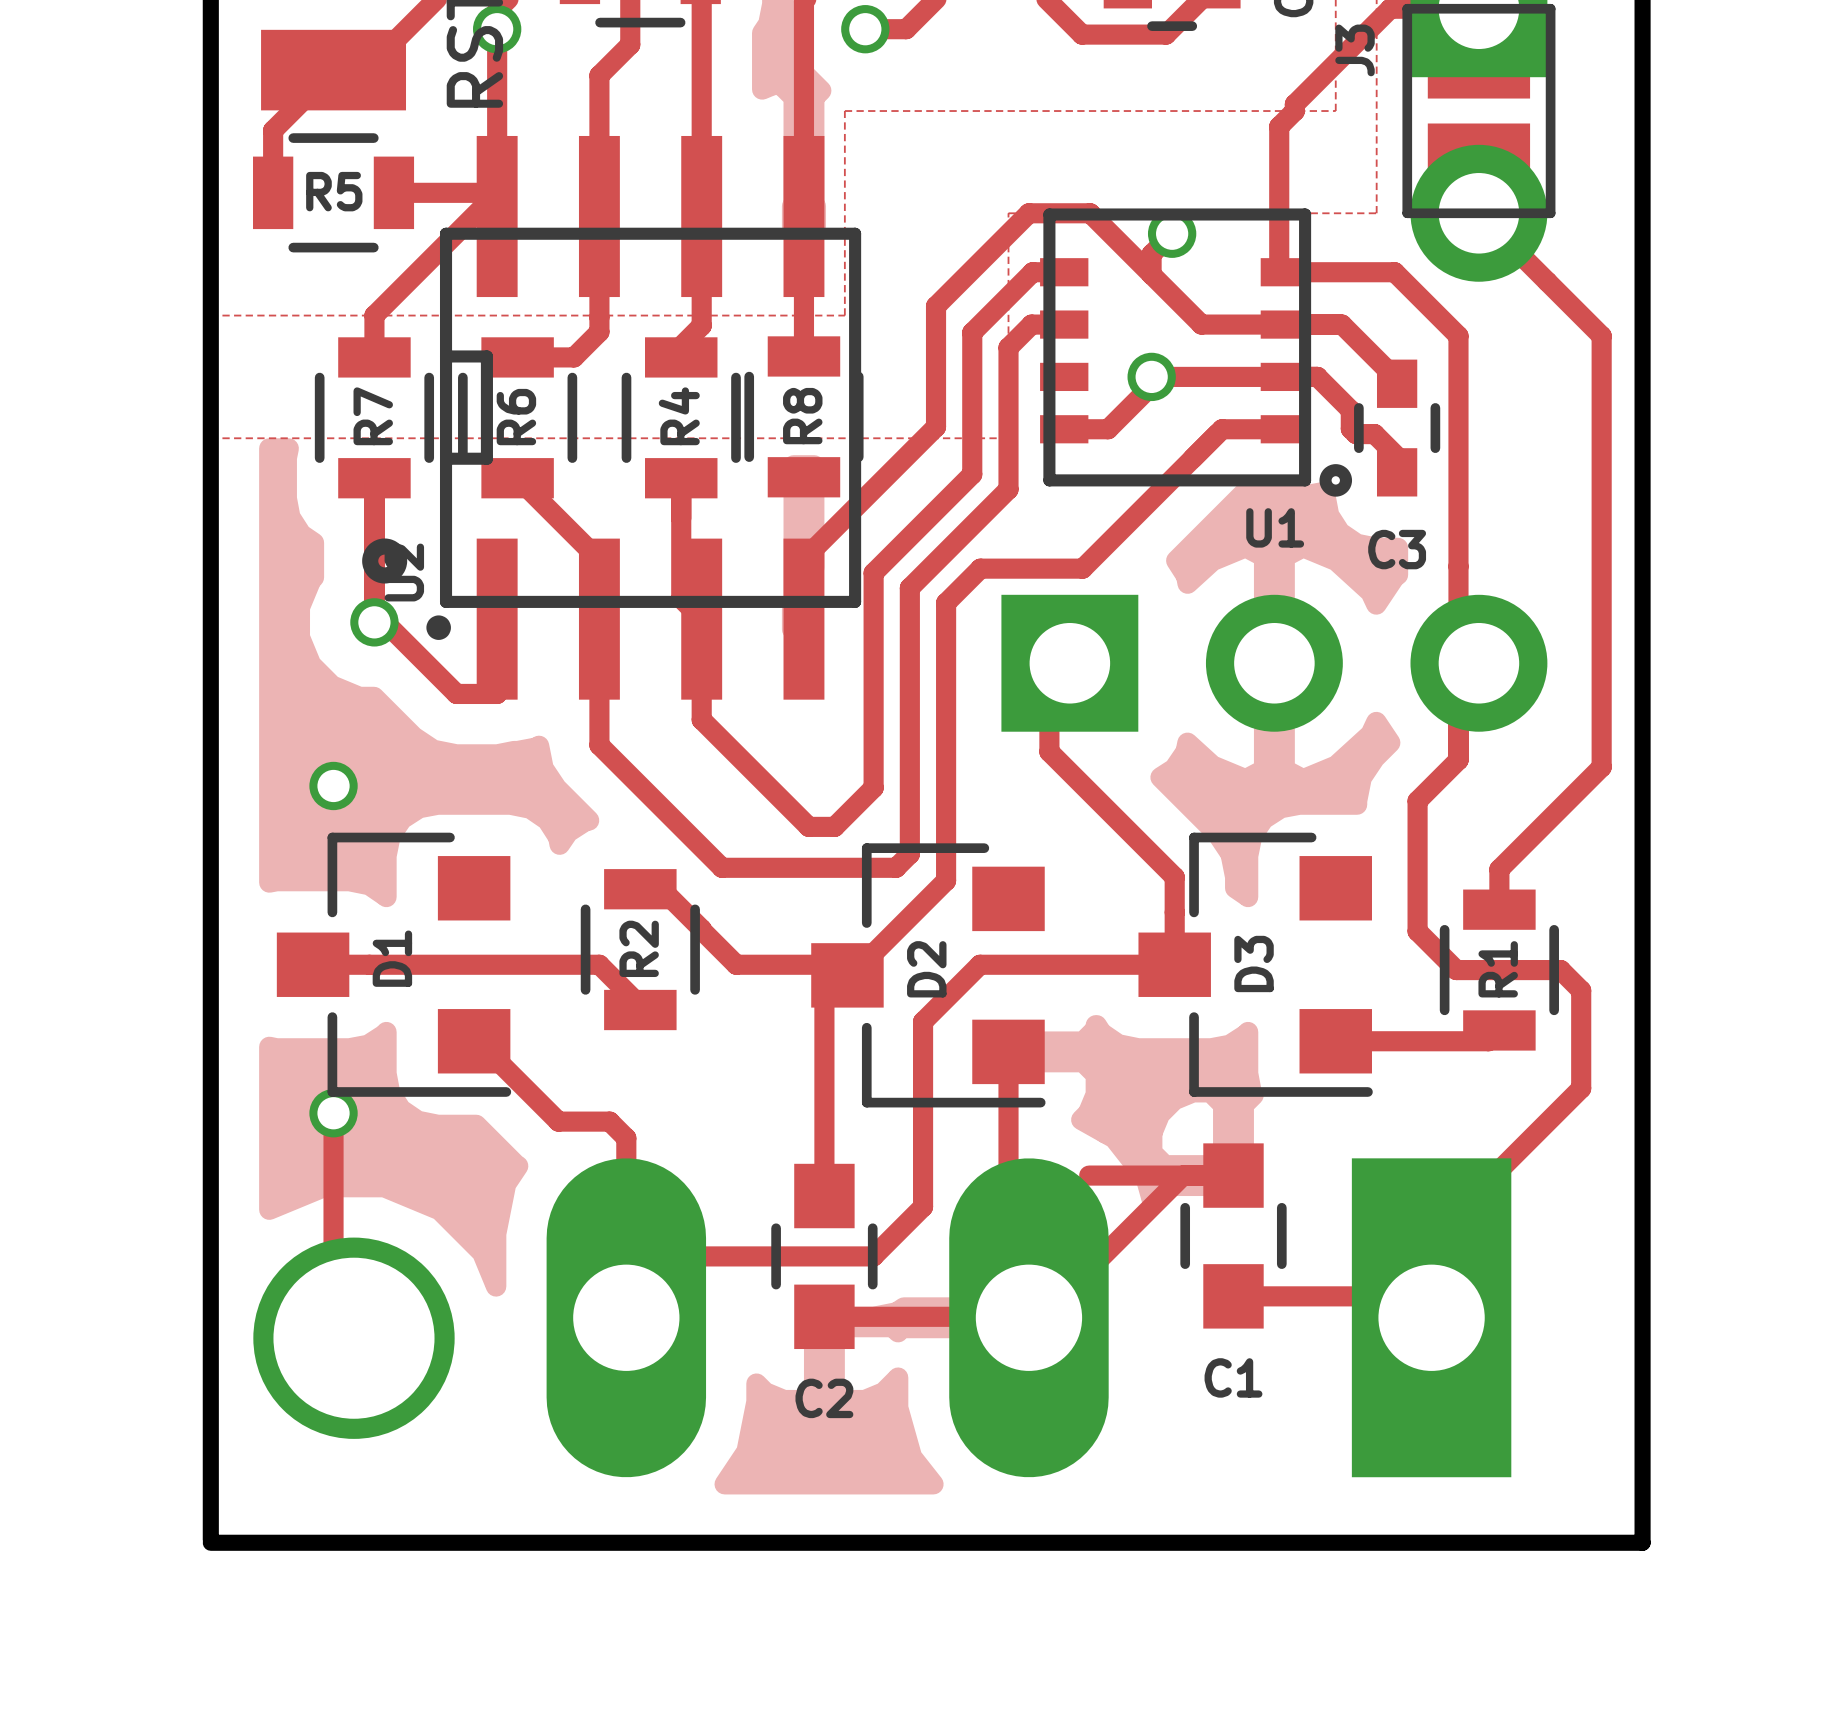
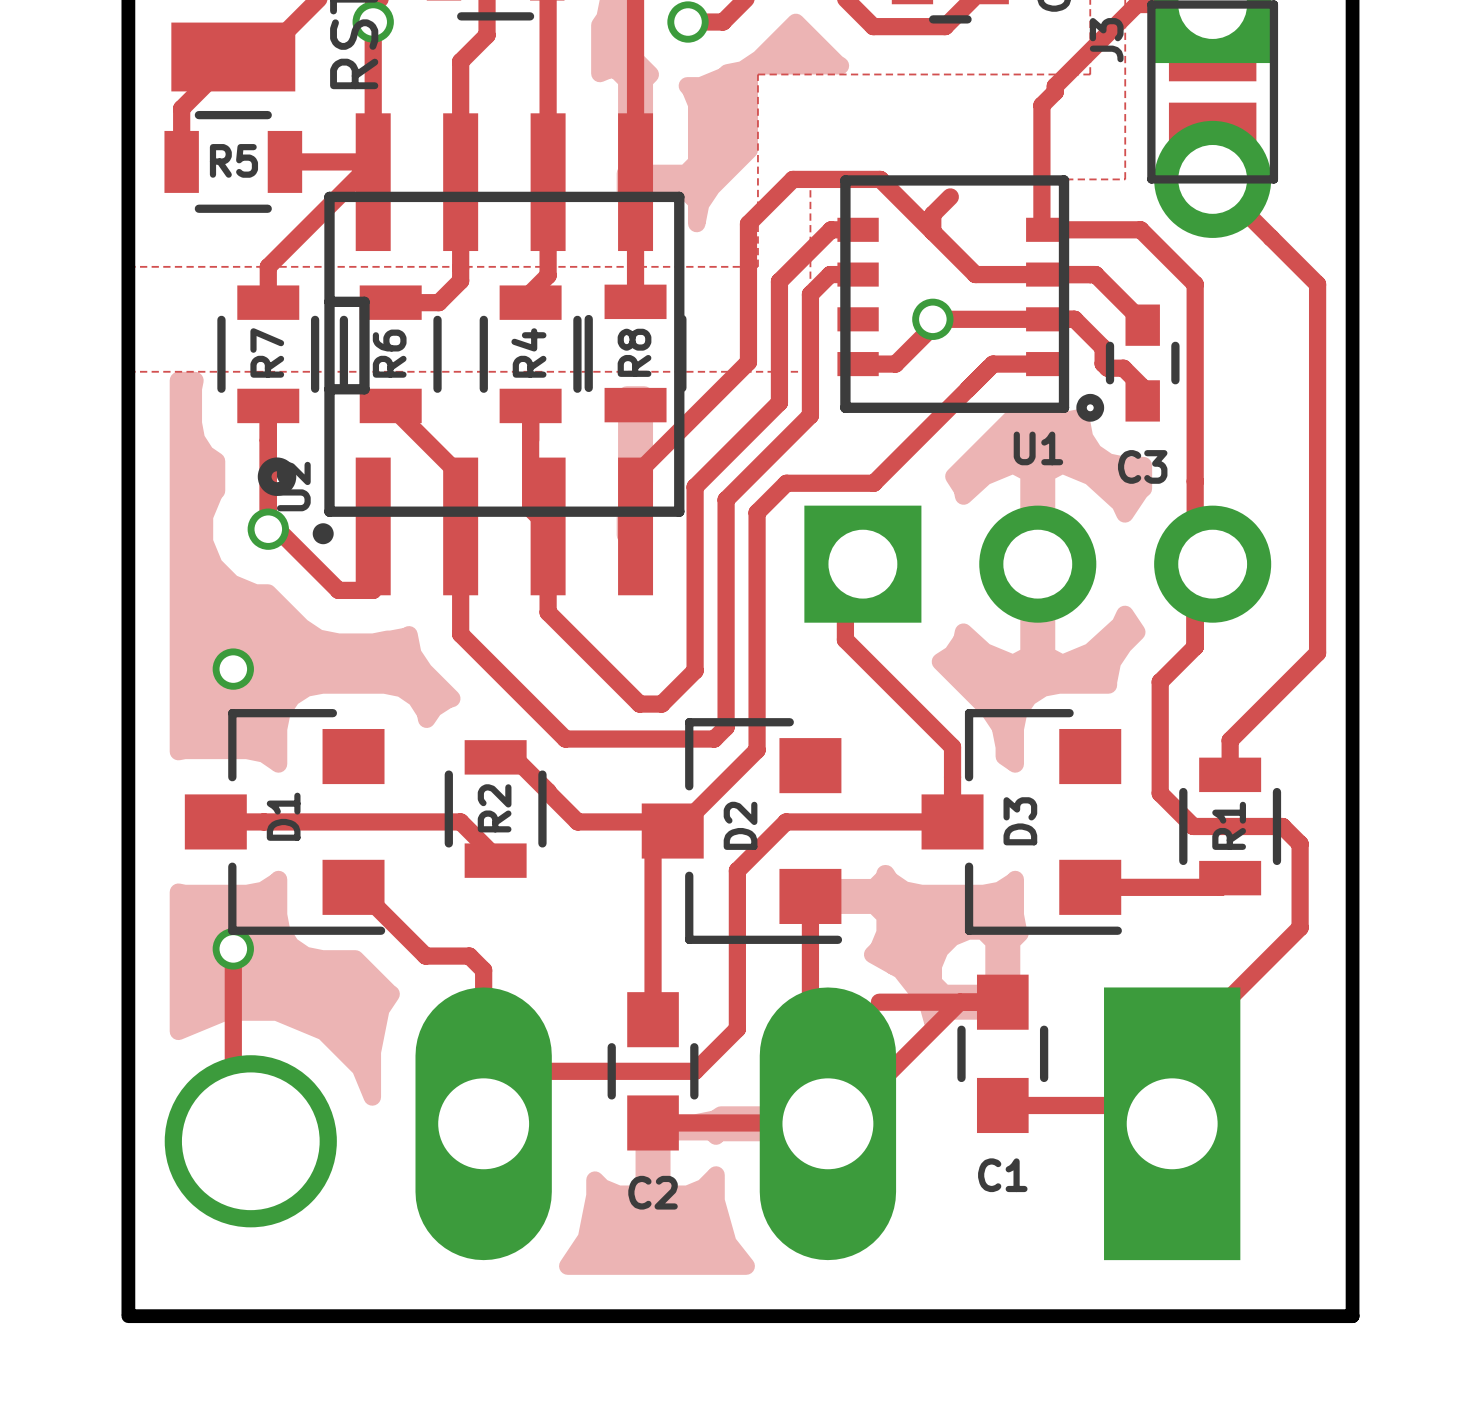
zone outline: (1335, 90) (1335, 111) (844, 111) (844, 315) -> (1090, 74) (757, 74) (757, 266) (670, 266)
track: (1028, 213) (936, 306) -> (827, 179) (792, 179) (748, 223) (748, 258)
via: (1172, 233) -> none

